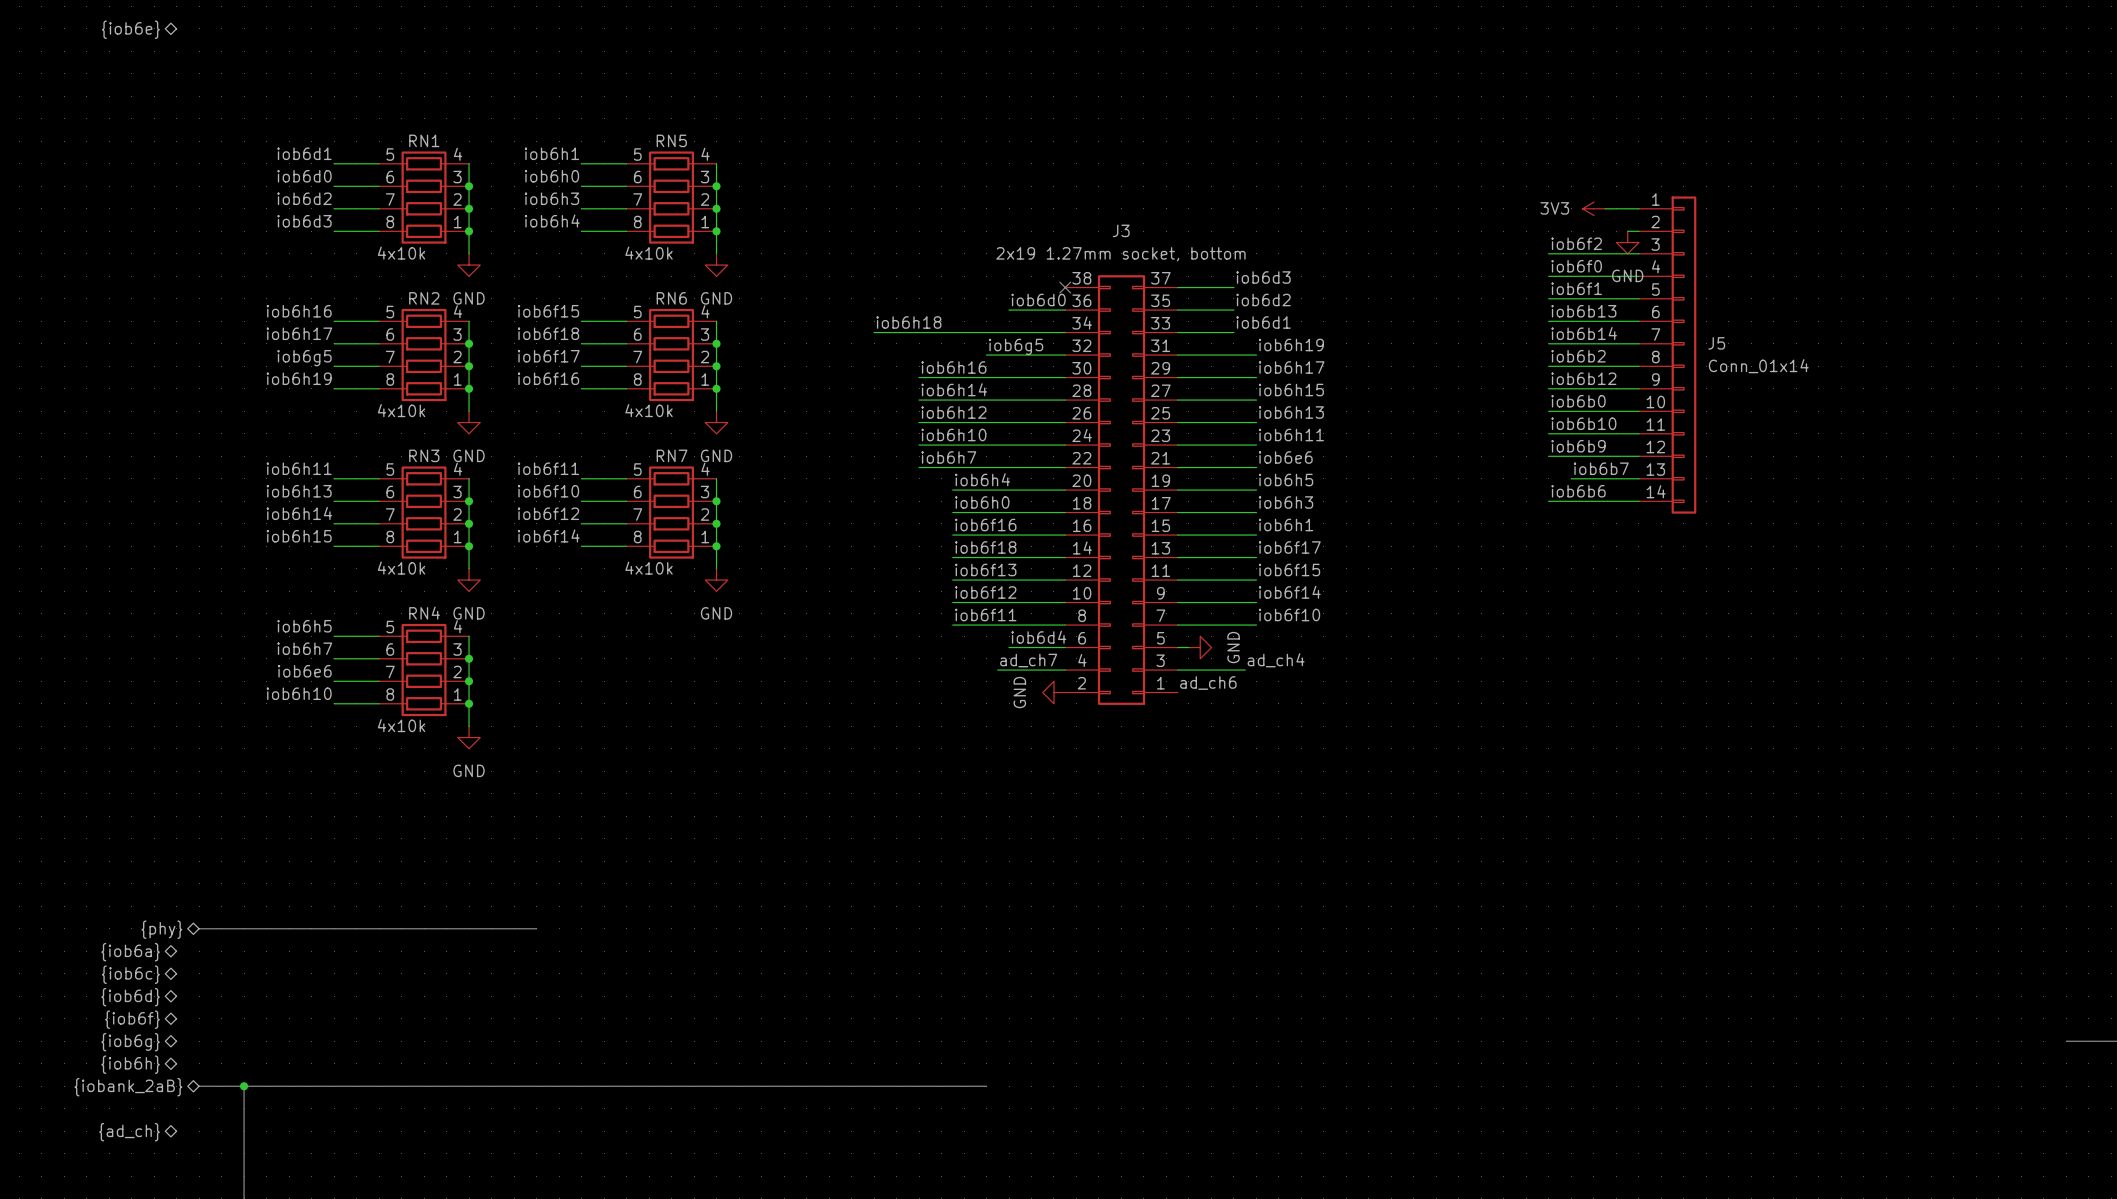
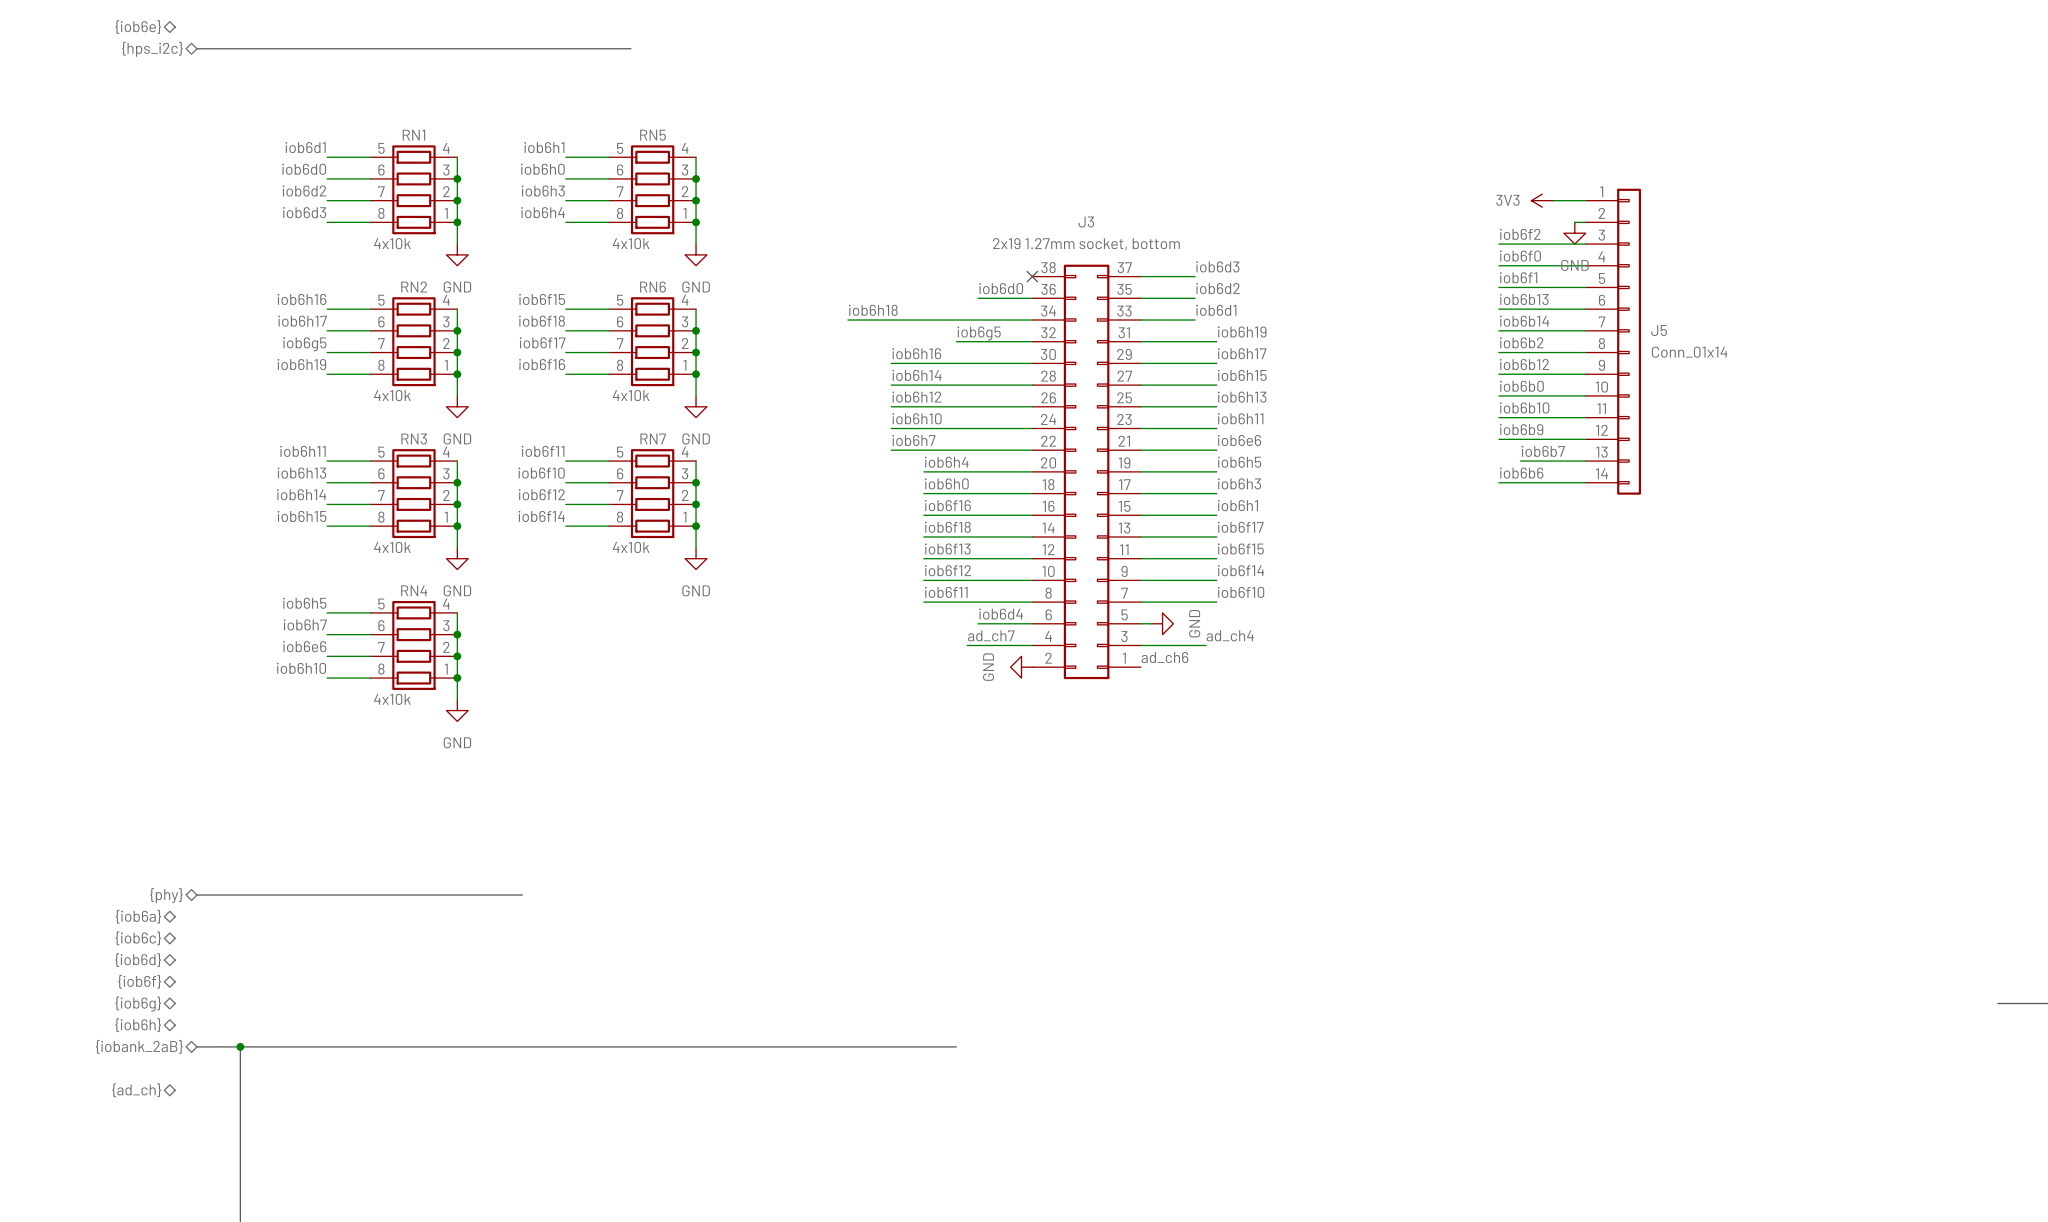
bus: none -> (196, 48) (630, 48)
hierarchical label: none -> {hps_i2c} (152, 49)

